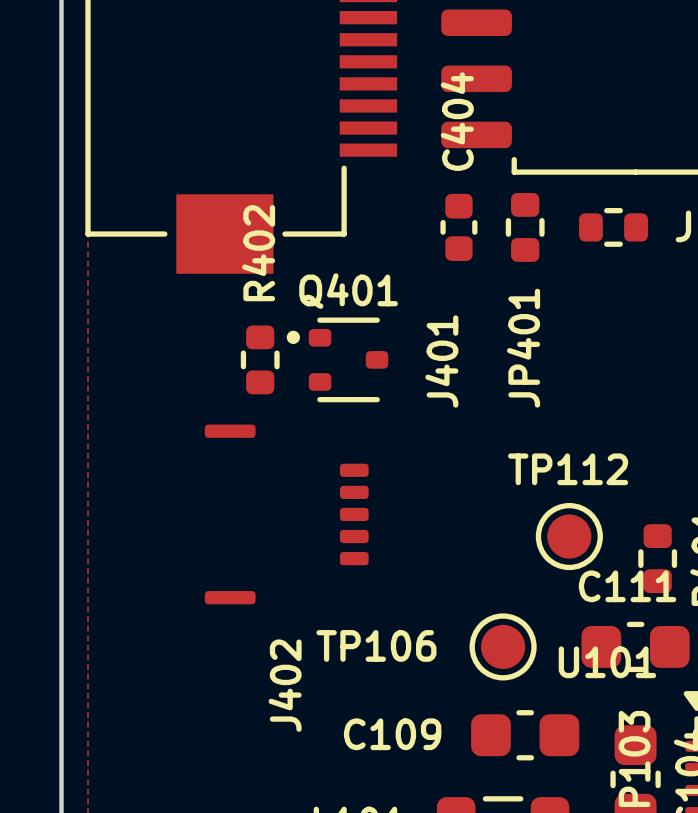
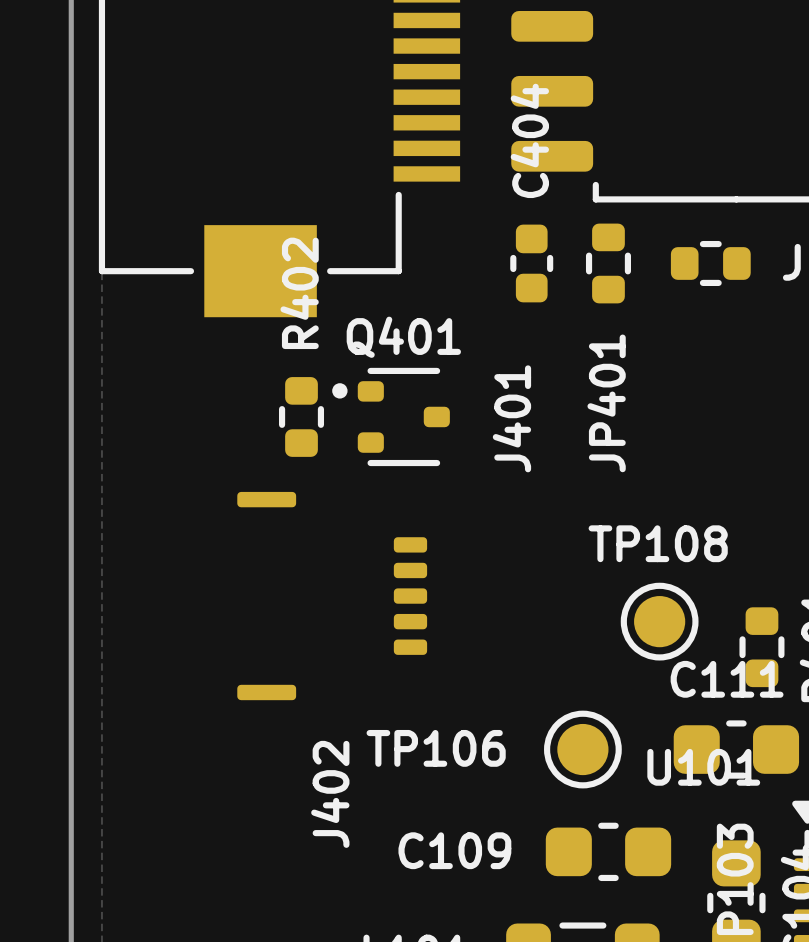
TP112 name: TP112 (568, 469) -> TP108 (658, 543)

